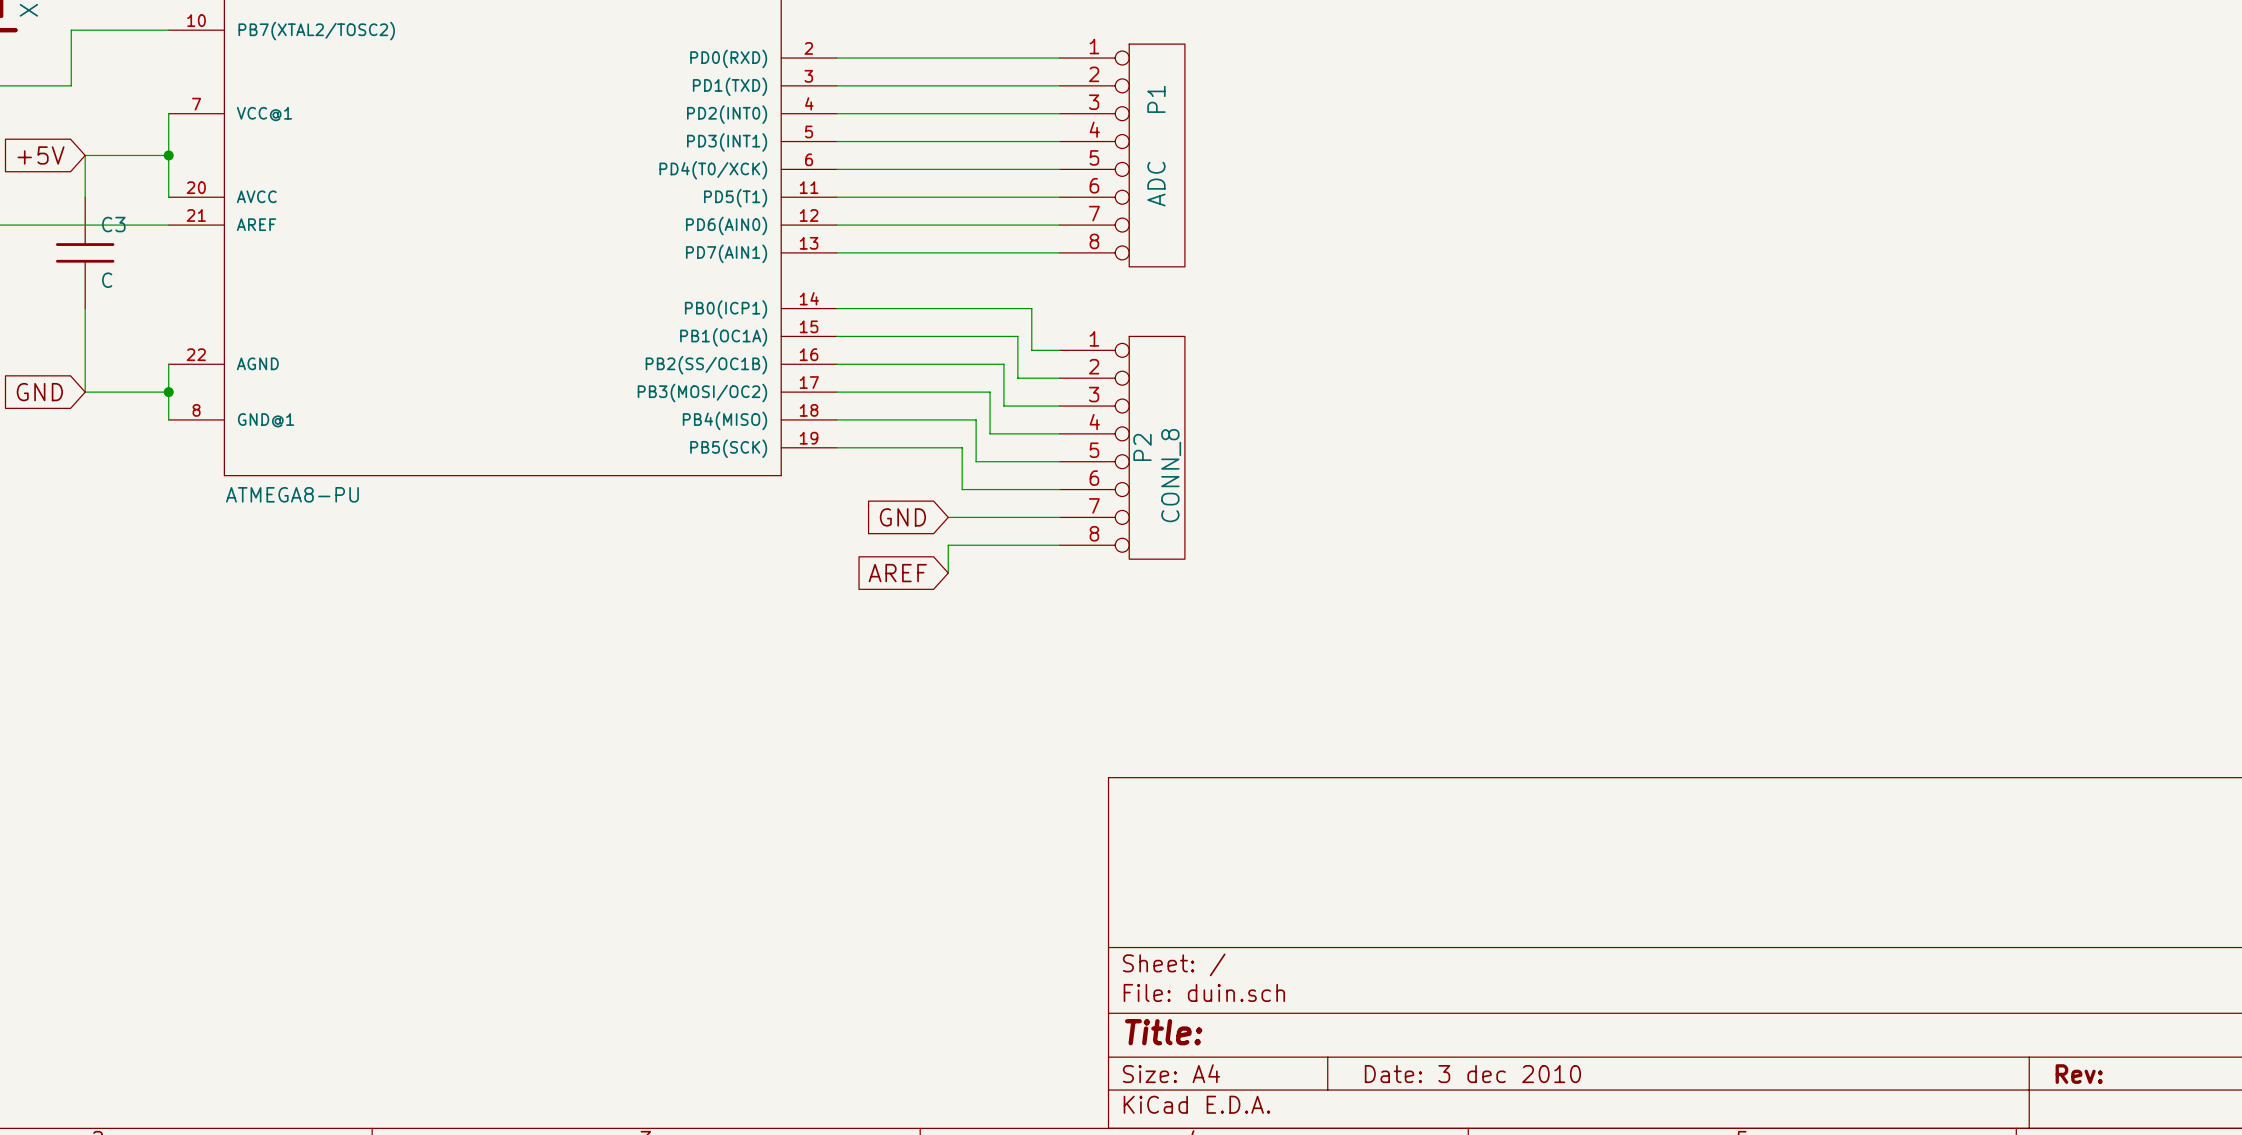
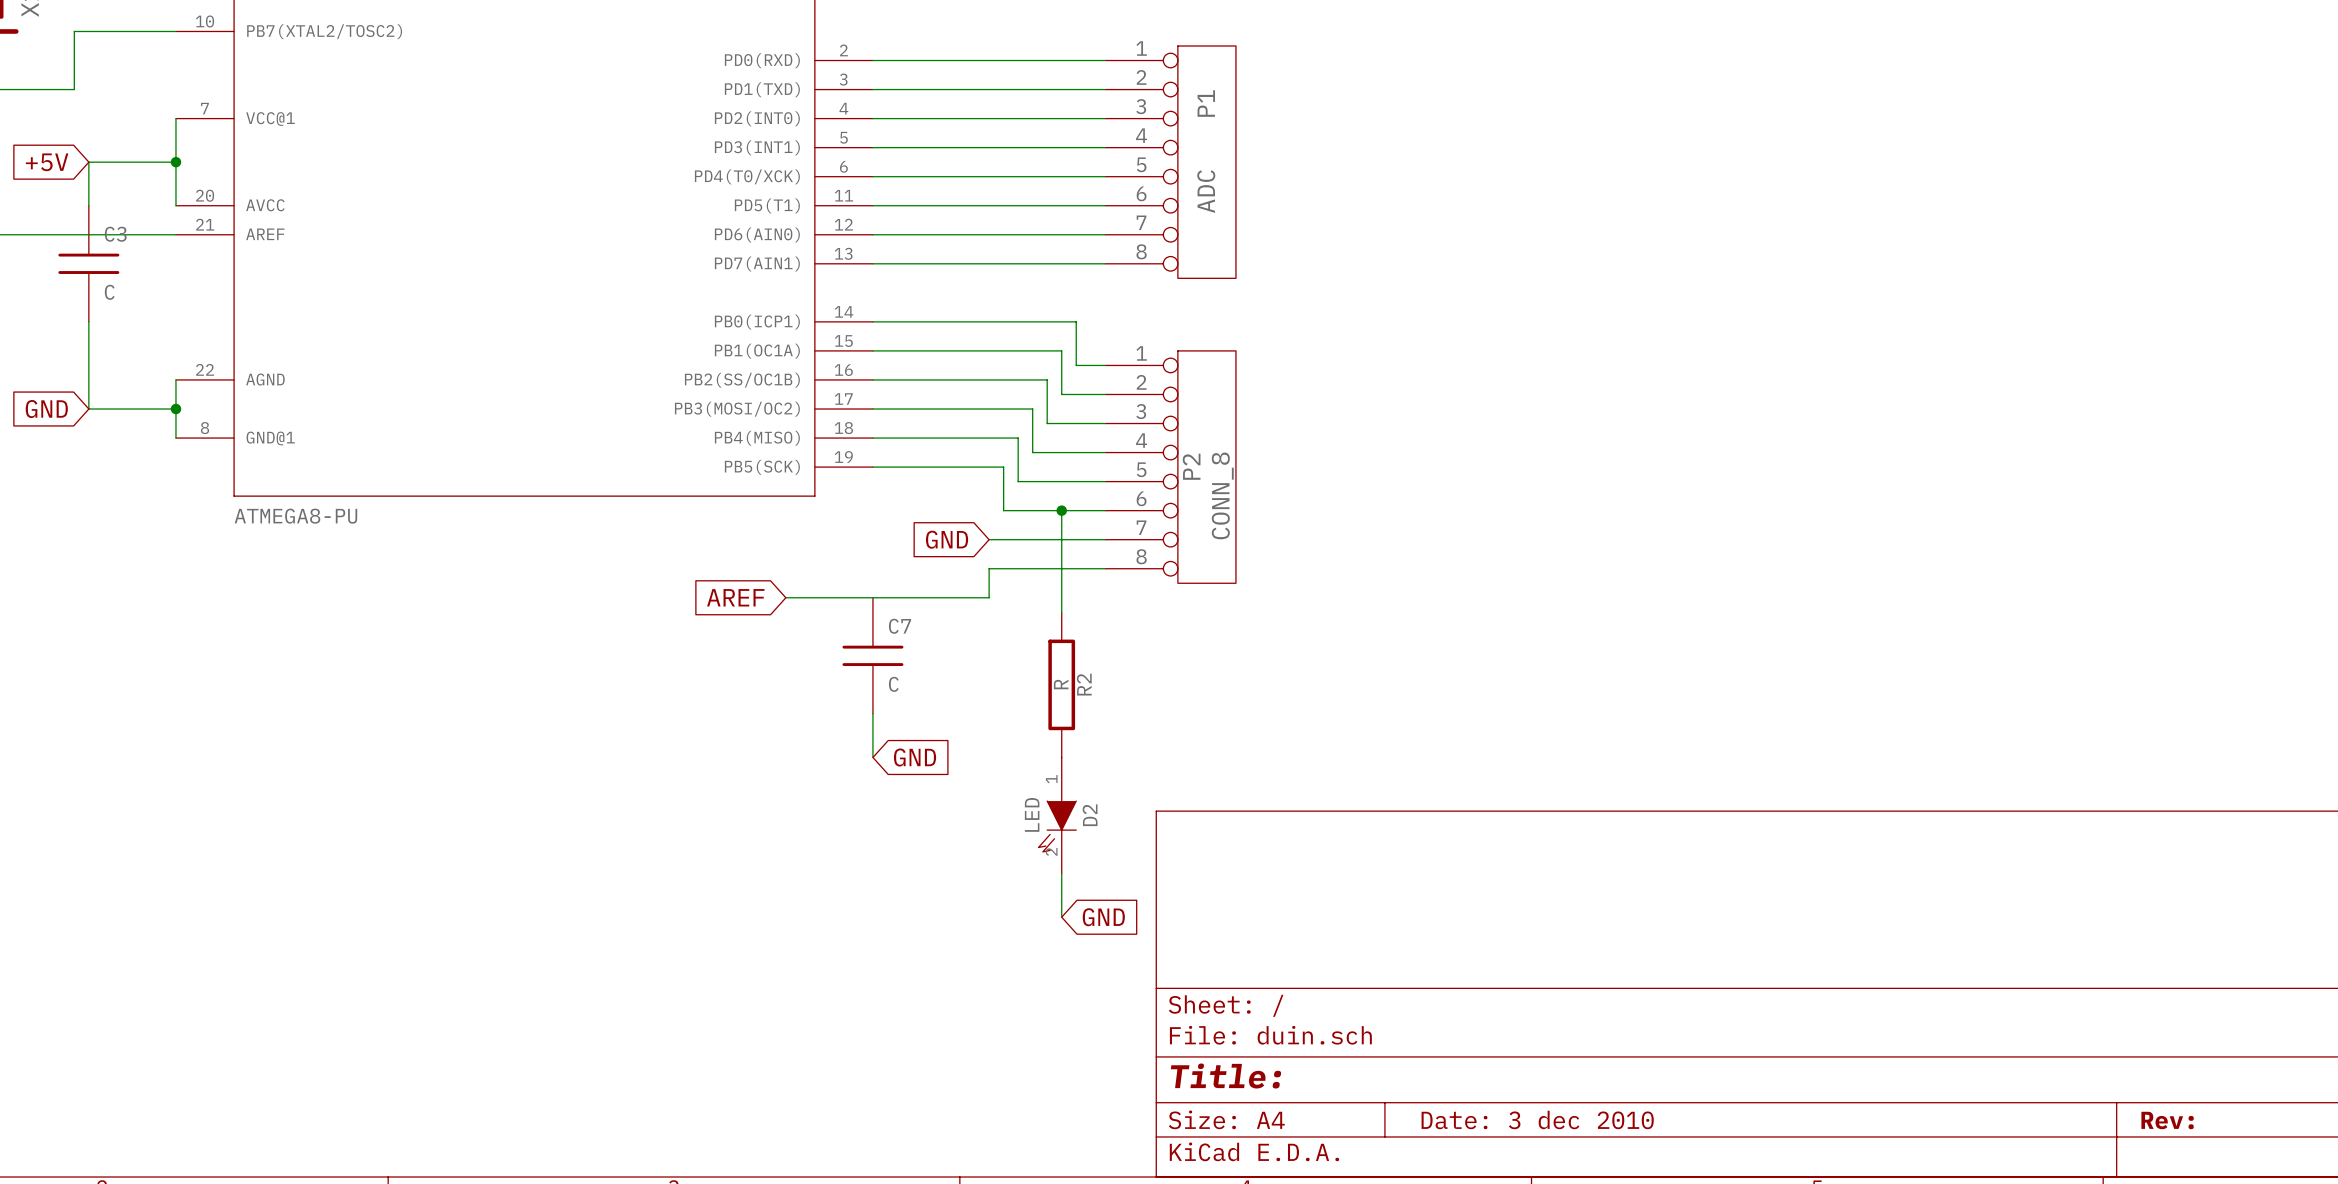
wire: none -> (1061, 510) (1061, 612)
junction: none -> (1061, 510)
wire: none -> (785, 597) (989, 597)
global label position: AREF (897, 573) -> AREF (735, 597)
C7: none -> C (872, 655)
R2: none -> R (1061, 684)
wire: none -> (872, 713) (872, 757)
global label: none -> GND (915, 757)
D2: none -> LED (1057, 815)
wire: none -> (1061, 873) (1061, 917)
global label: none -> GND (1103, 917)

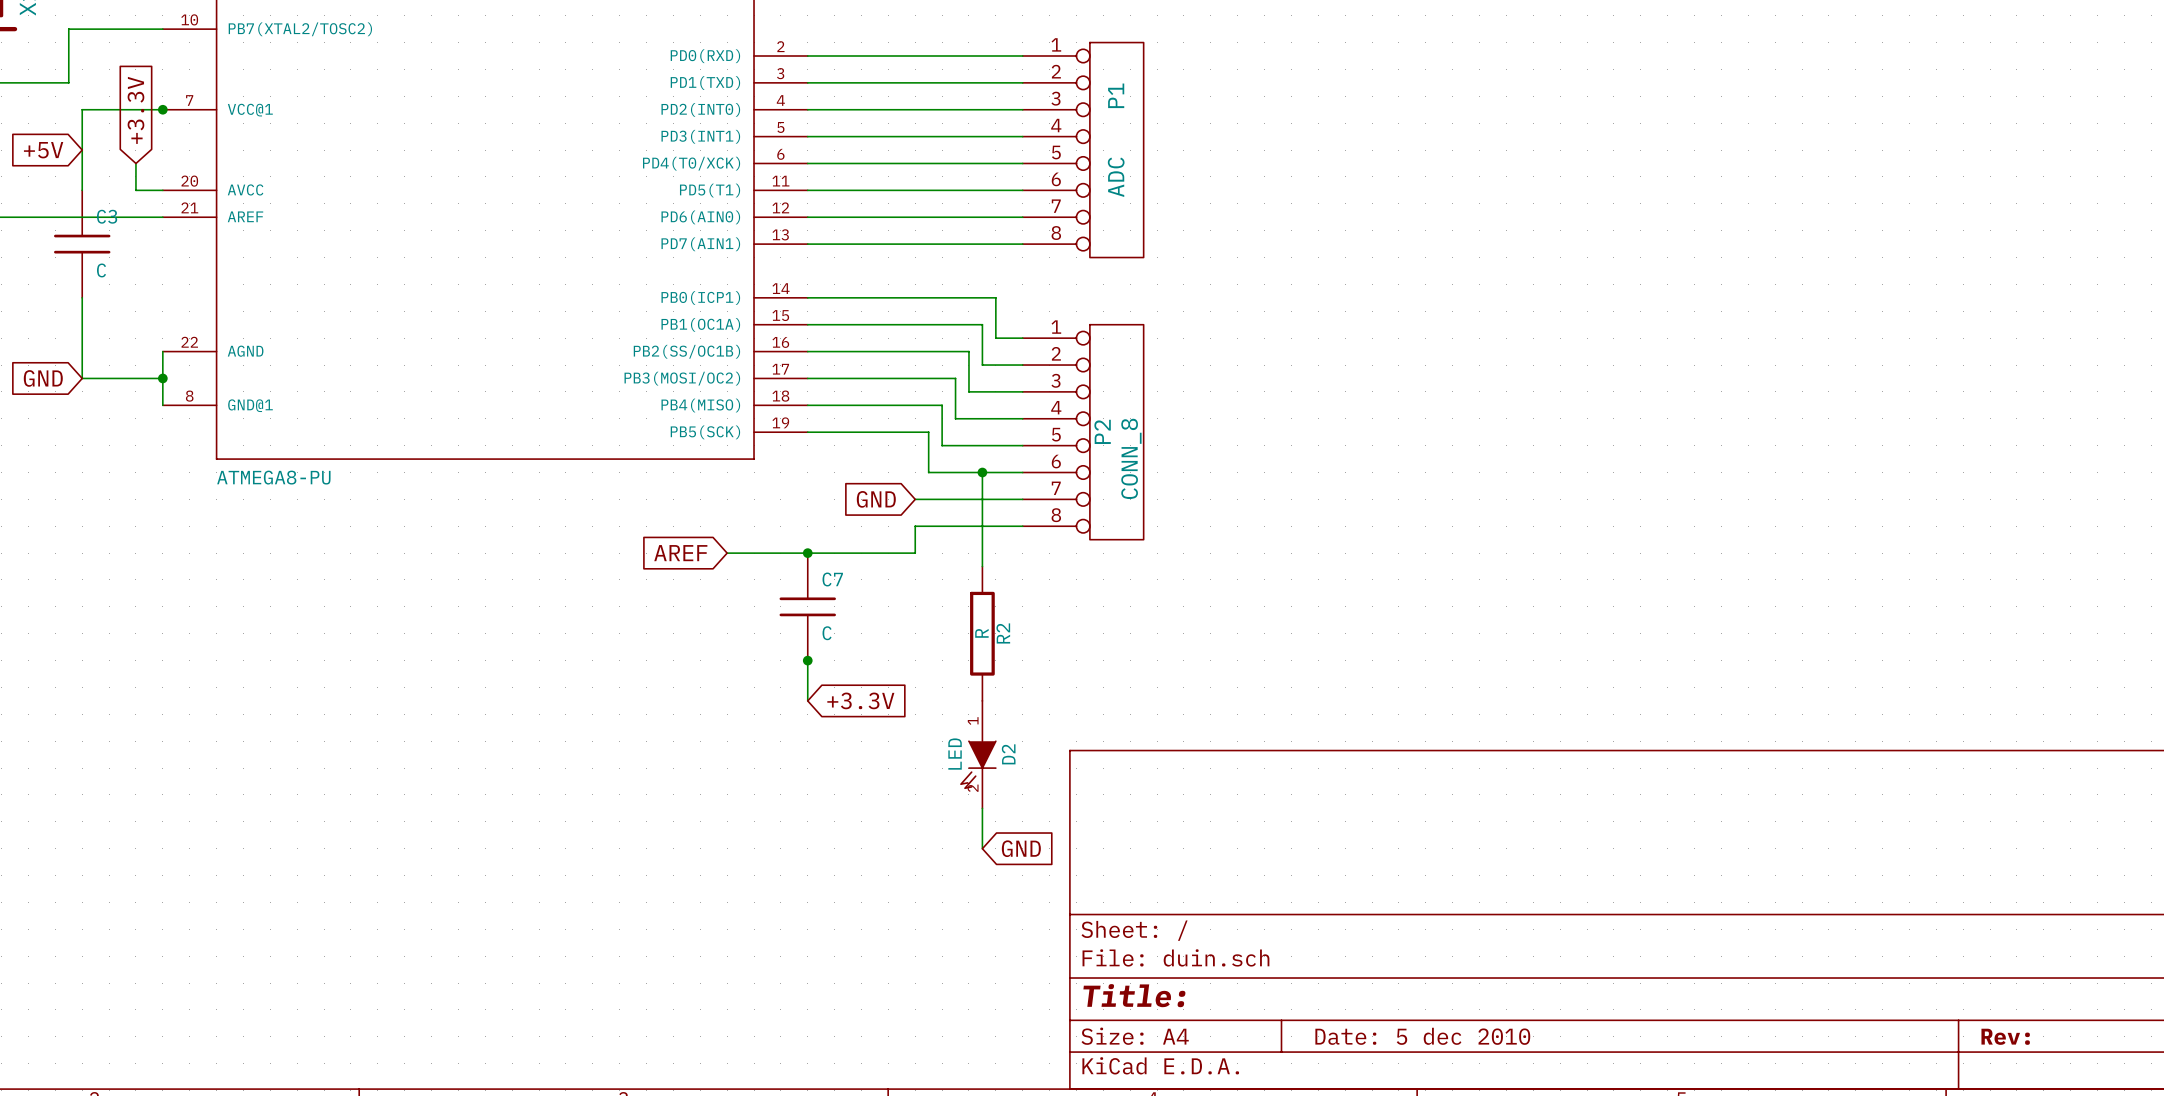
wire: (175, 118) (175, 205) -> (135, 163) (135, 190) (162, 190)
global label: none -> +3.3V (135, 110)
wire: (88, 162) (175, 162) -> (82, 150) (82, 109) (162, 109)
junction position: (175, 162) -> (162, 109)
junction: none -> (807, 553)
junction: none -> (807, 660)
global label: GND (915, 757) -> +3.3V (860, 700)
title block: Date: 3 dec 2010 (1537, 1119) -> Date: 5 dec 2010 (1422, 1036)

